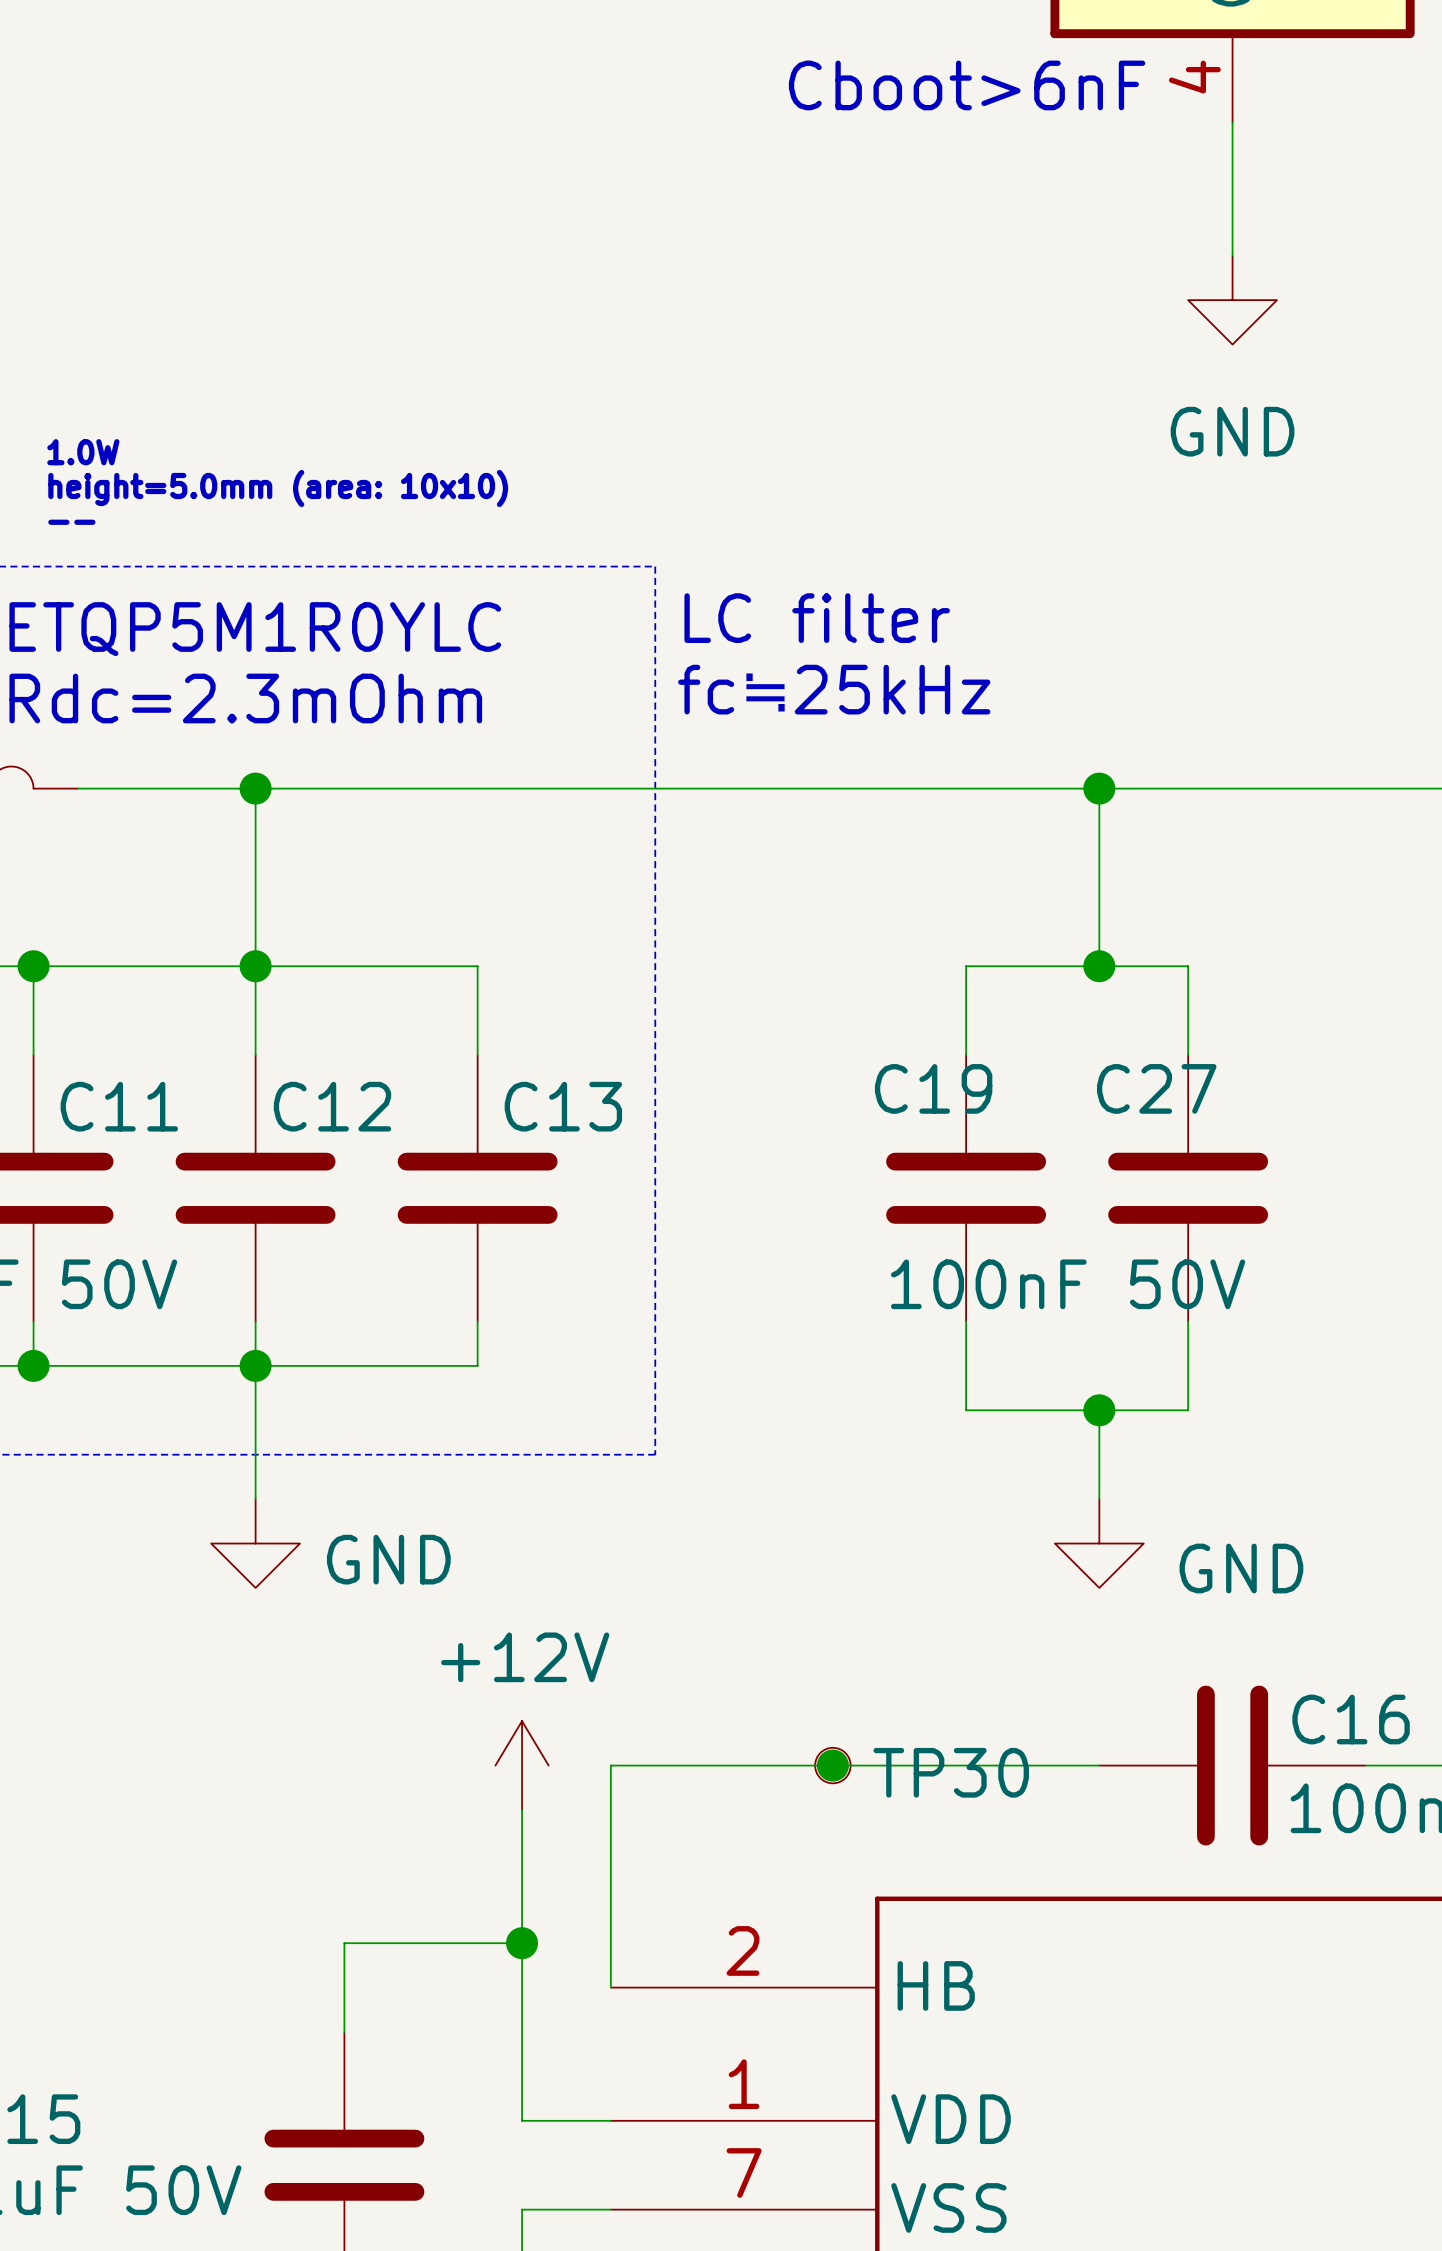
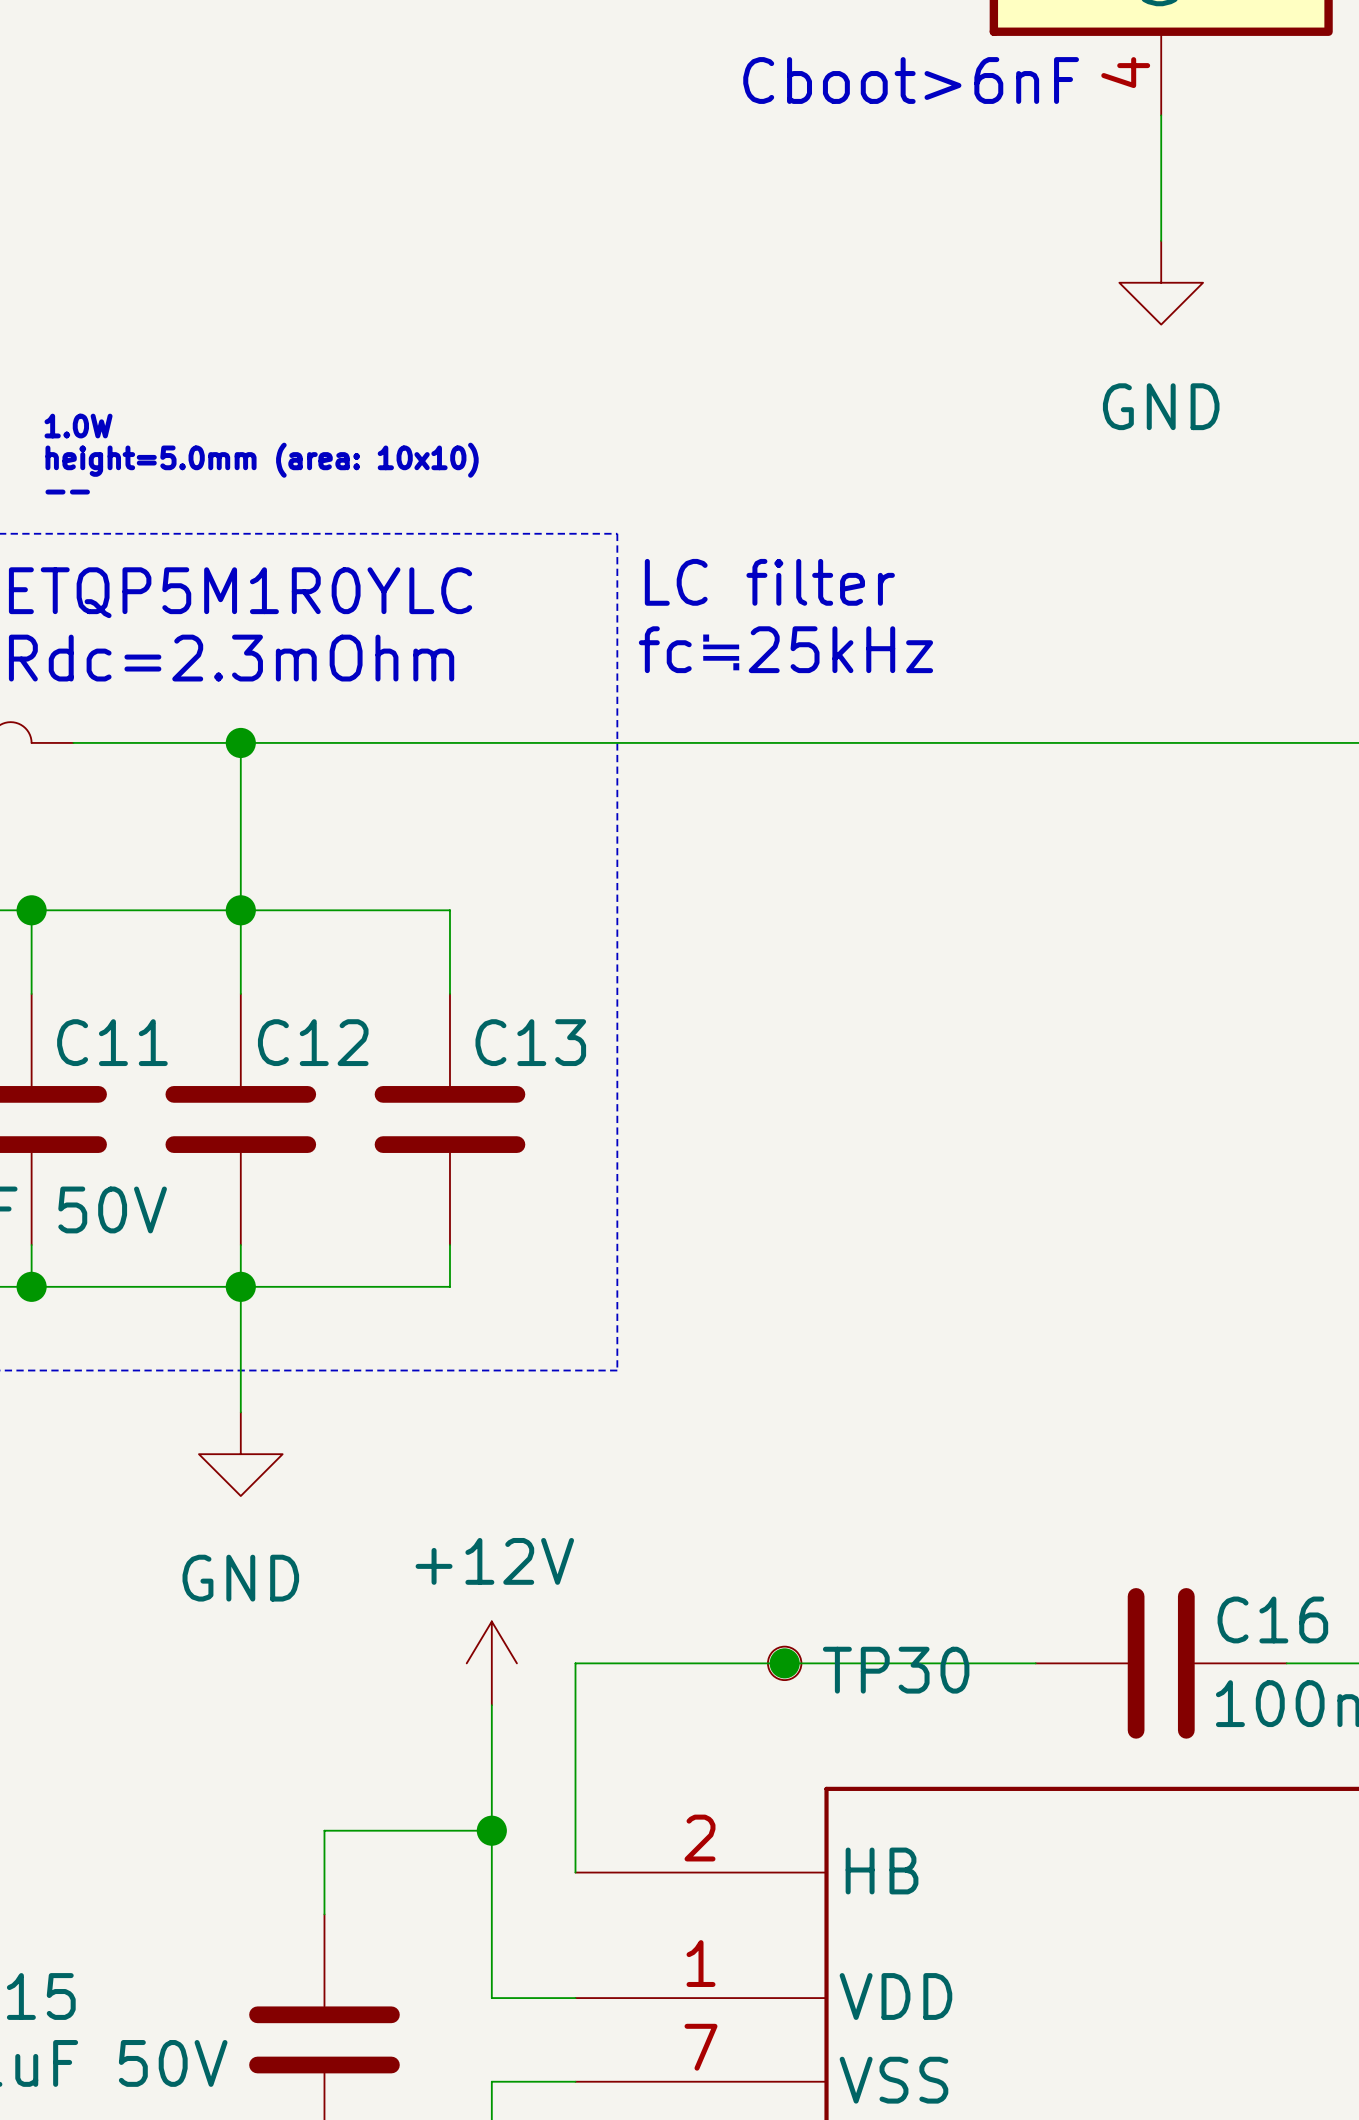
wire: (1099, 788) (1099, 966) -> none
junction: (1099, 788) -> none
junction: (1099, 966) -> none
wire: (966, 1055) (966, 966) (1188, 966) (1188, 1055) -> none
C19: 100nF 50V (966, 1188) -> none
C27: (1188, 1188) -> none
wire: (966, 1321) (966, 1410) (1188, 1410) (1188, 1321) -> none
wire: (1099, 1410) (1099, 1499) -> none
junction: (1099, 1410) -> none
power symbol: GND (1099, 1543) -> none
power symbol text position: GND (388, 1559) -> GND (240, 1578)

